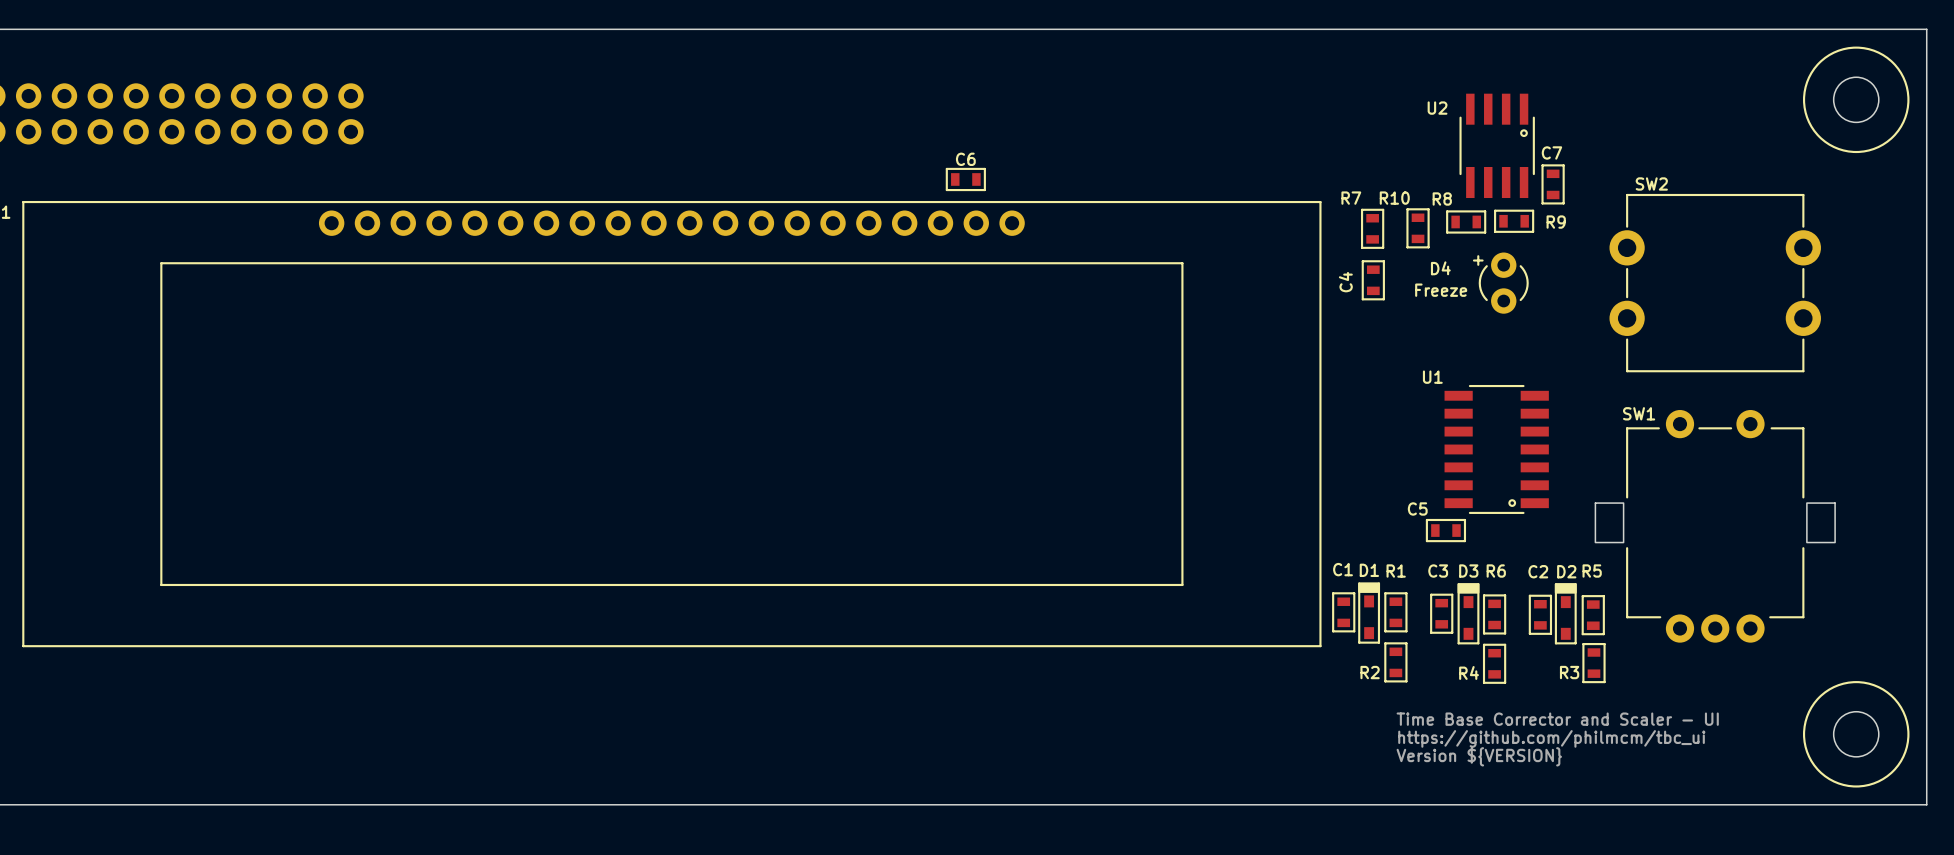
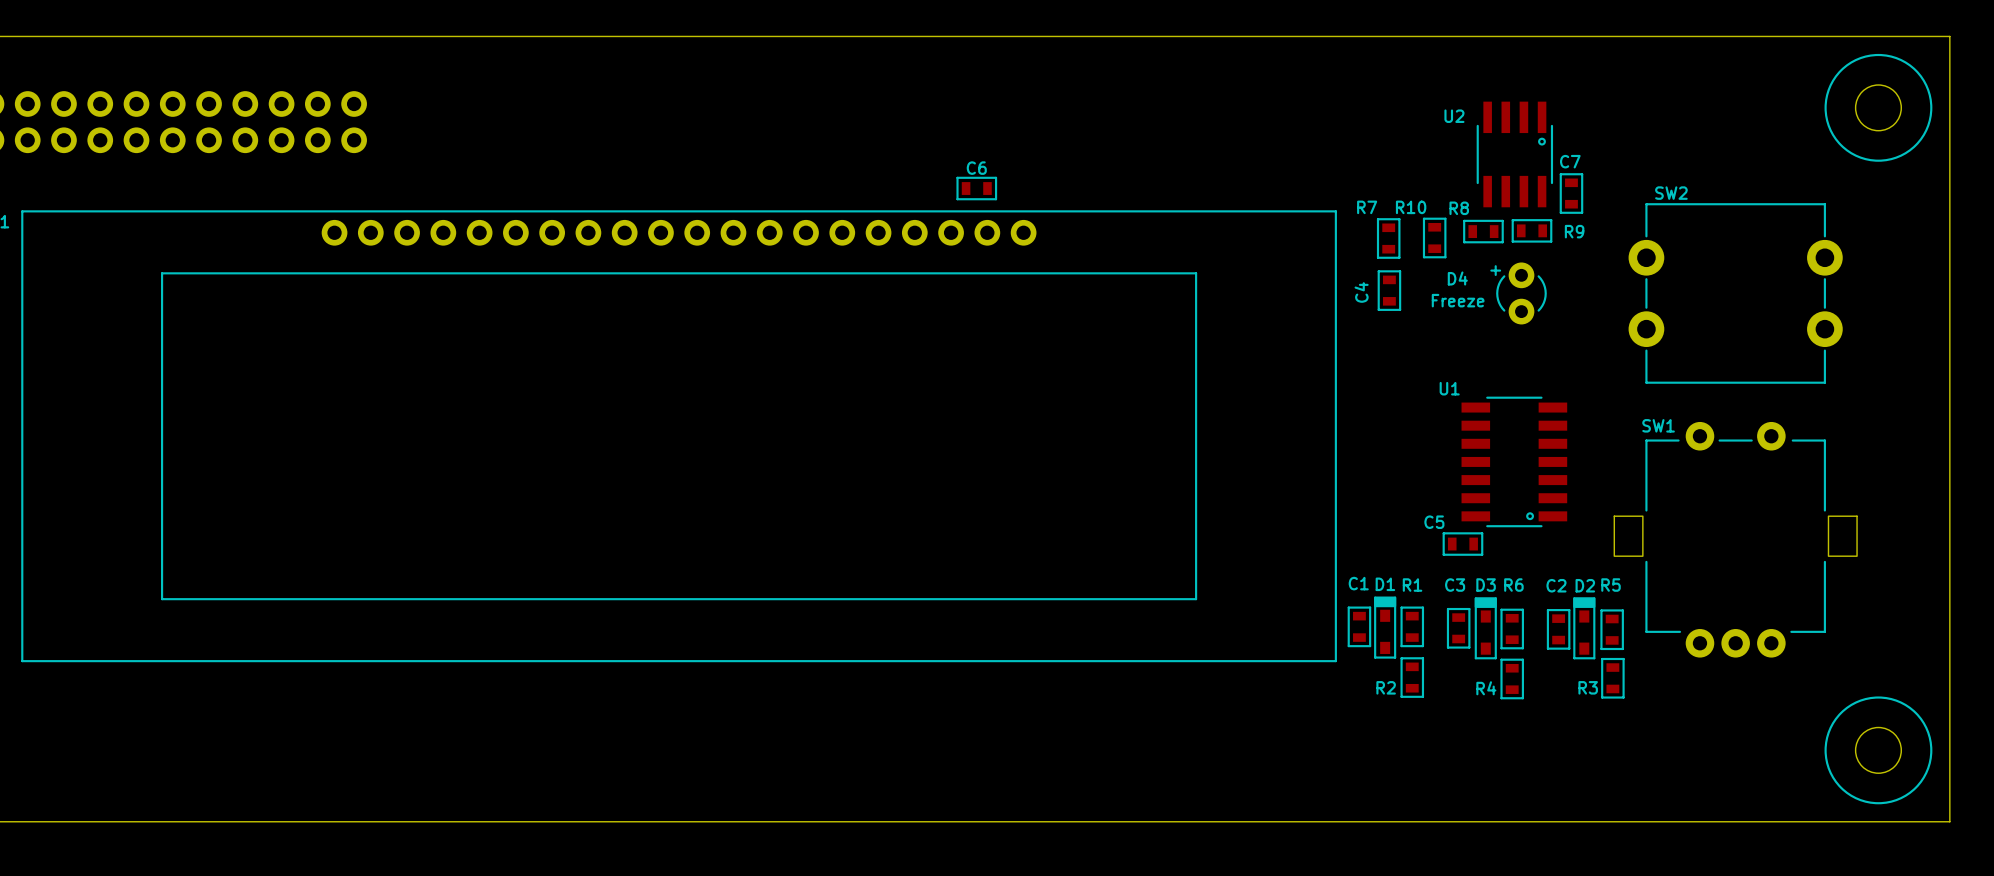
text: Time Base Corrector and Scaler - UI (1557, 719) -> none
text: https://github.com/philmcm/tbc_ui (1551, 738) -> none
text: Version ${VERSION} (1479, 756) -> none

